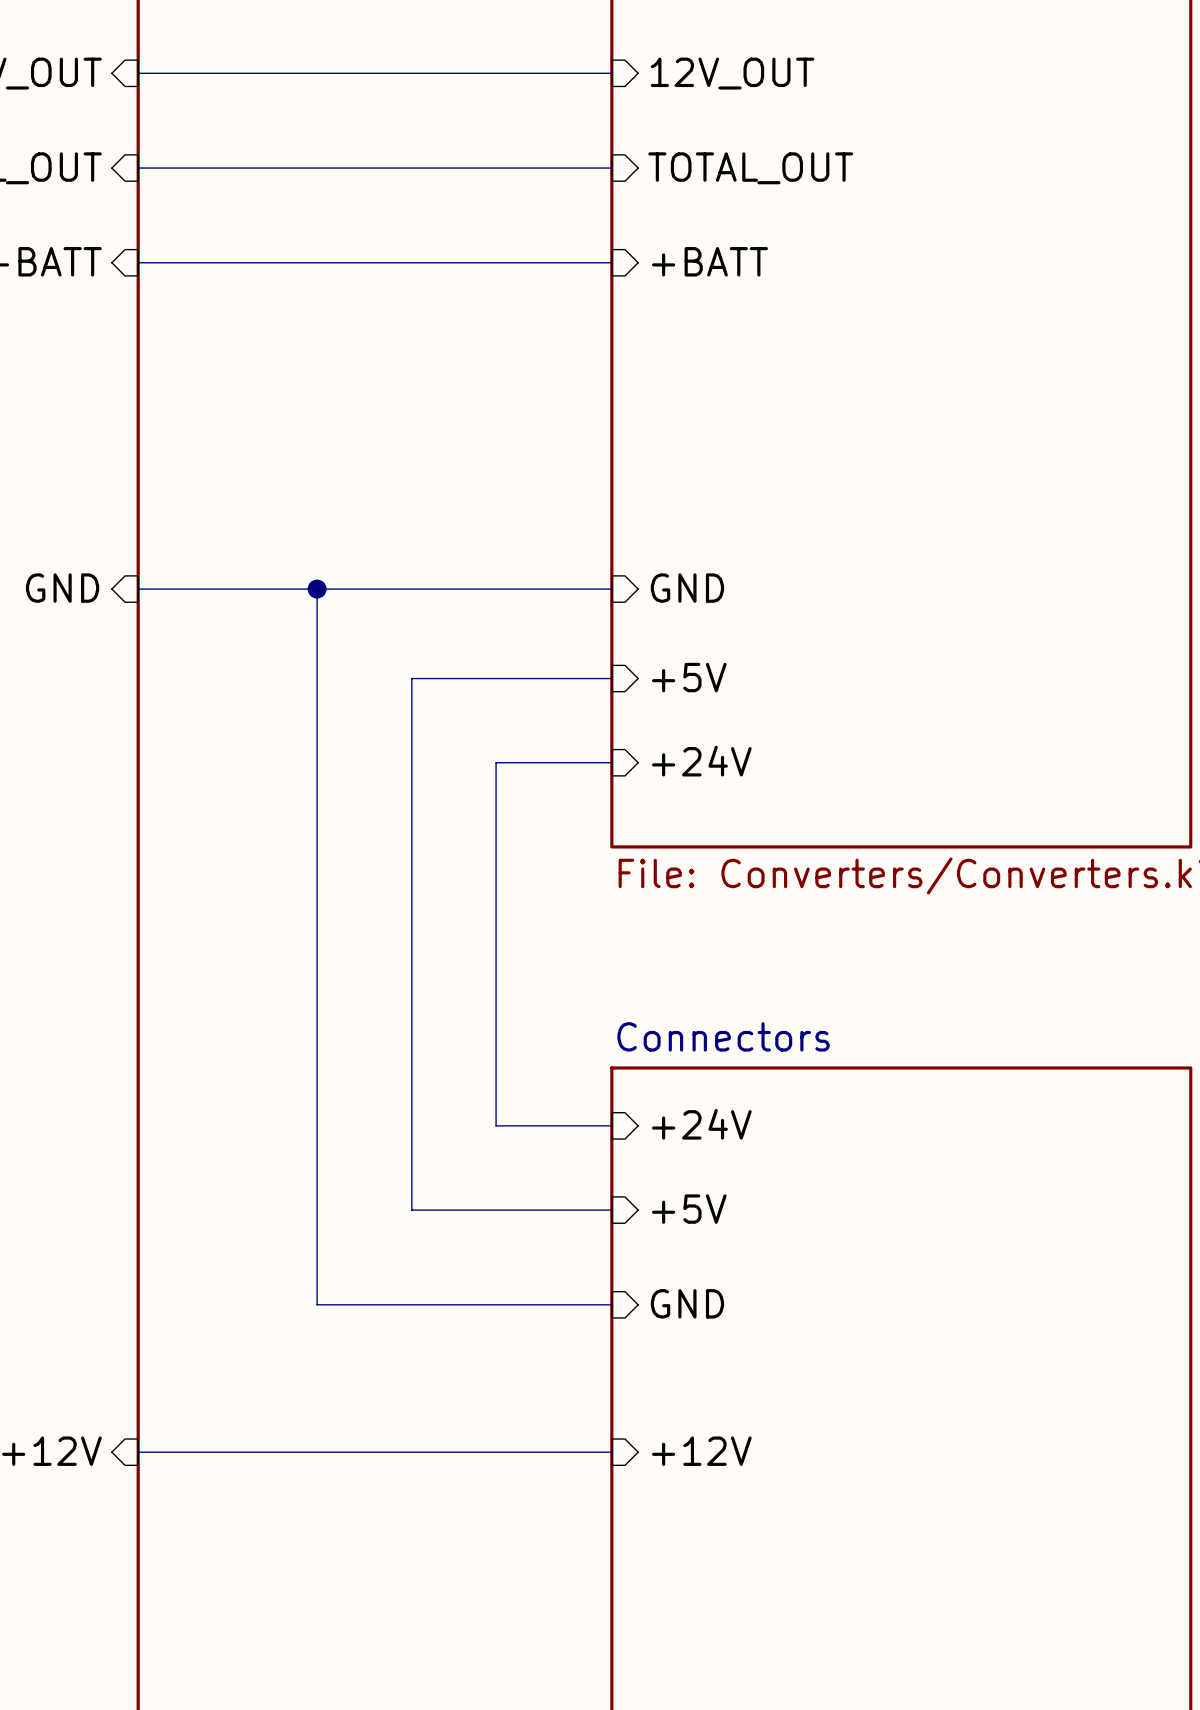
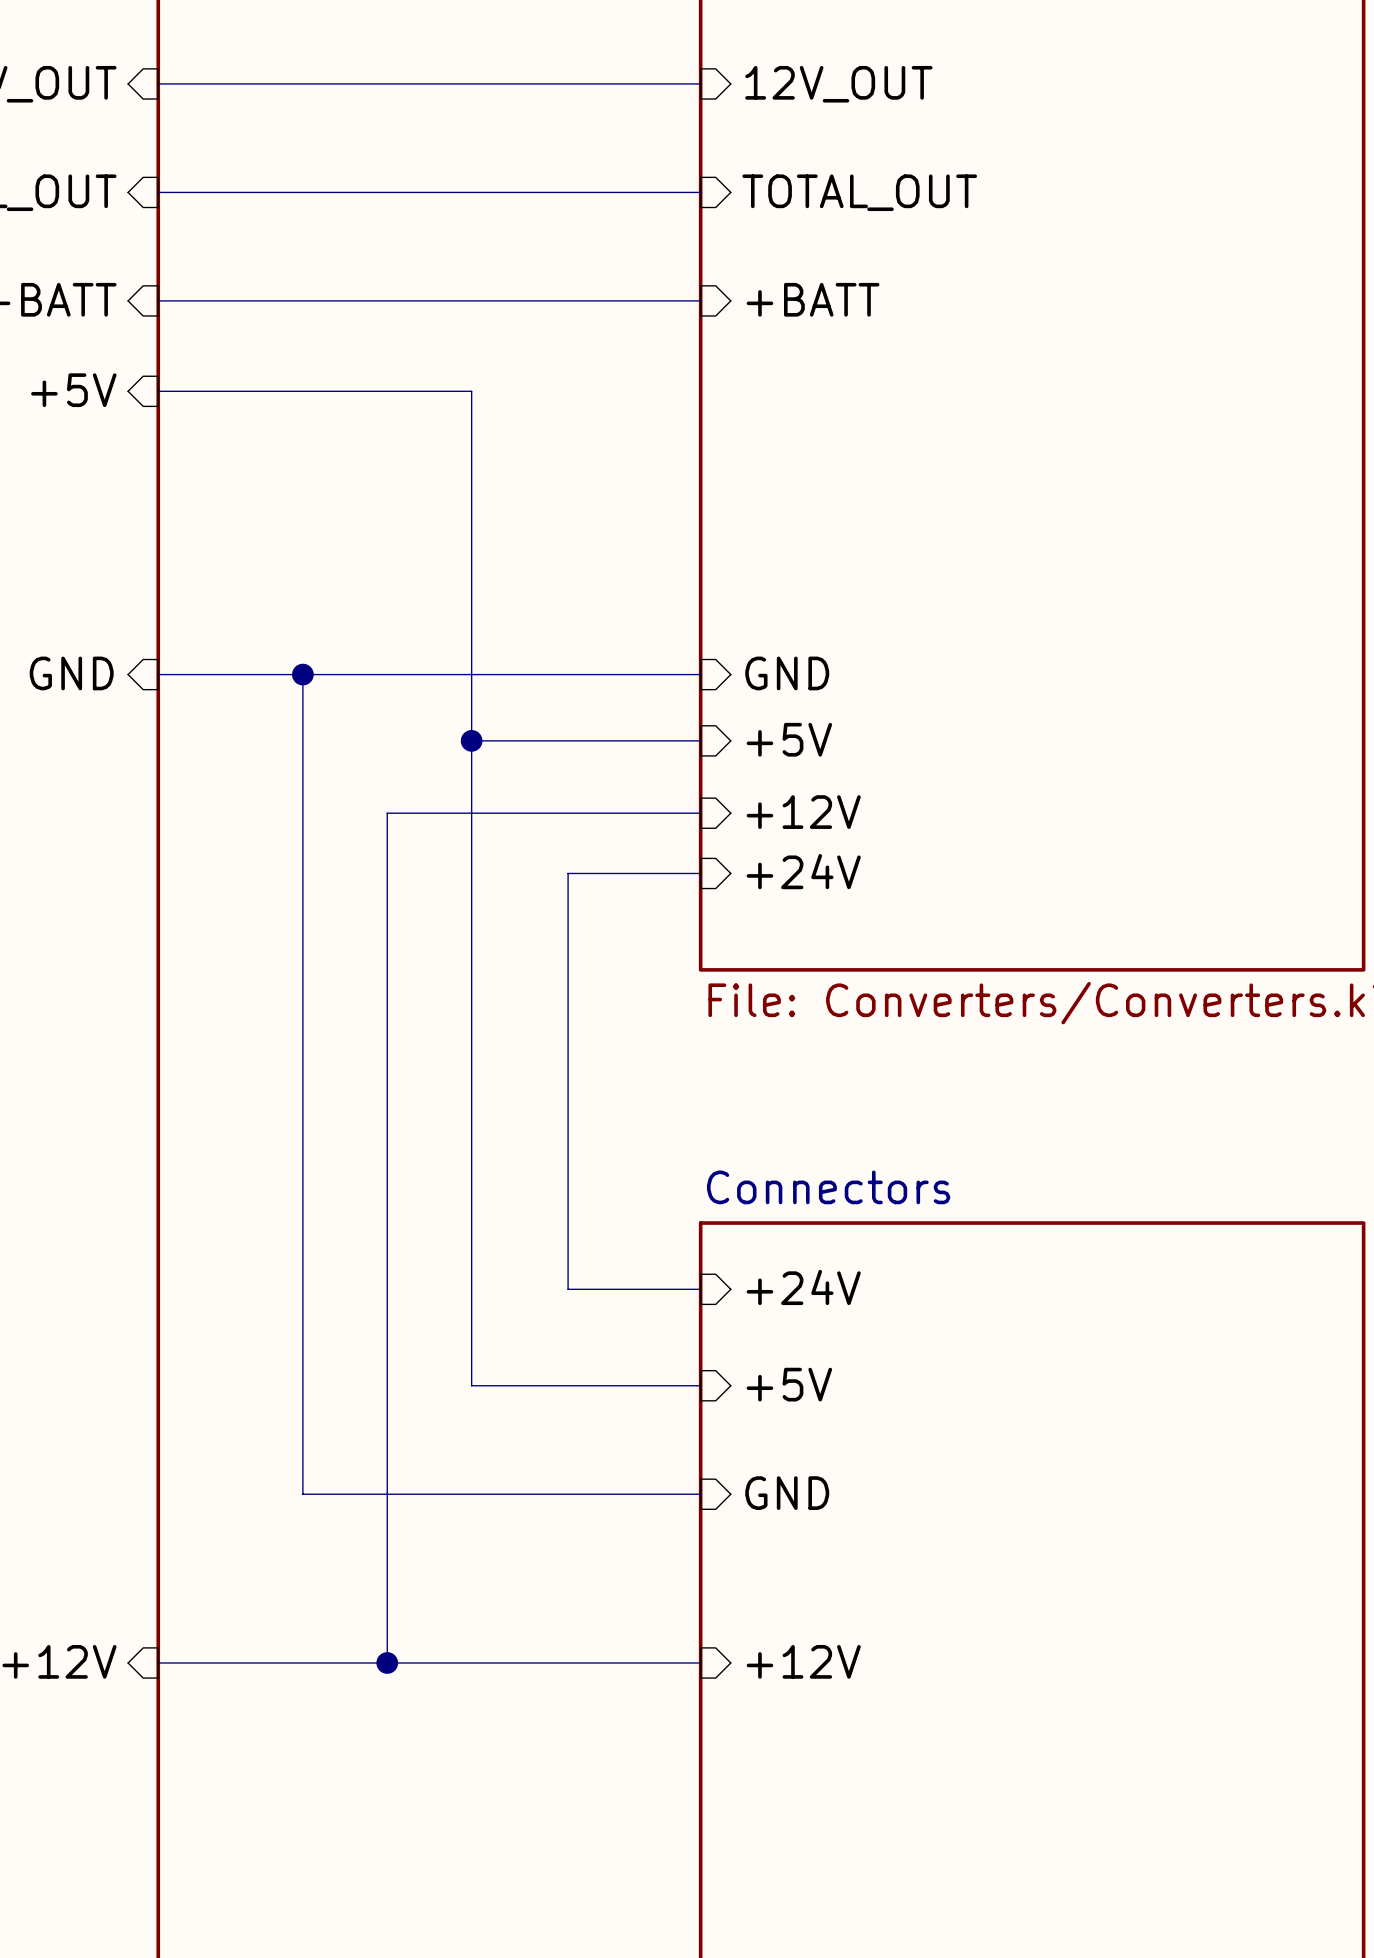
sheet pin: none -> +5V (73, 390)
wire: (317, 589) (317, 1304) -> (302, 674) (302, 1494) (363, 1494)
junction position: (317, 589) -> (302, 674)
wire: none -> (471, 740) (700, 740)
junction: none -> (471, 740)
sheet pin position: +5V (689, 677) -> +5V (789, 739)
wire: (411, 678) (611, 678) -> (471, 777) (471, 391) (158, 391)
sheet pin: none -> +12V (803, 812)
wire: none -> (700, 813) (387, 813) (387, 1662)
junction: none -> (387, 1662)

